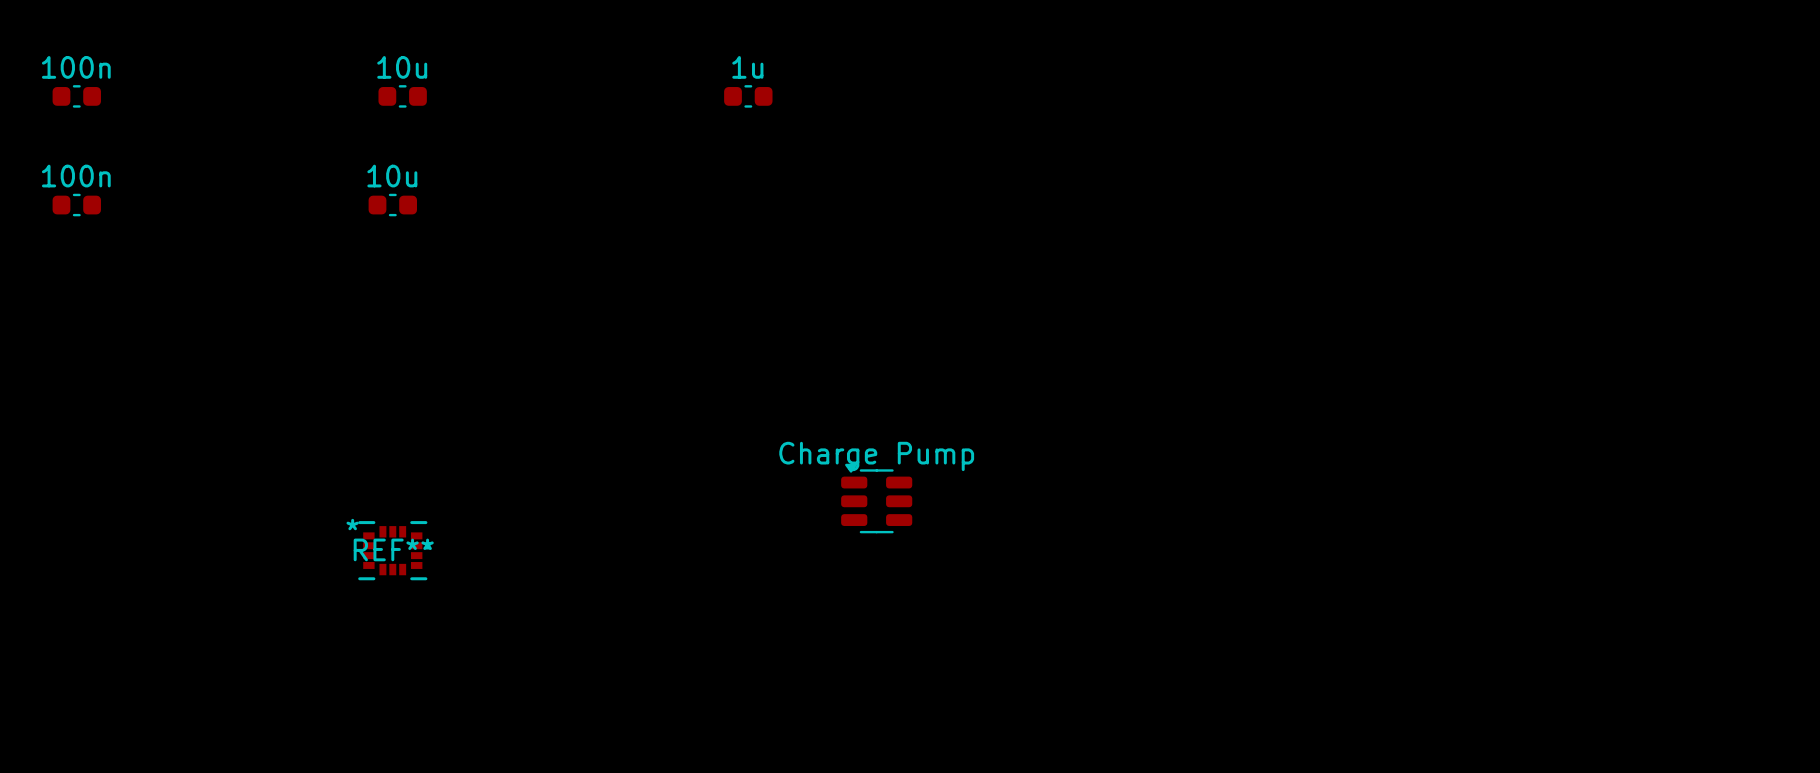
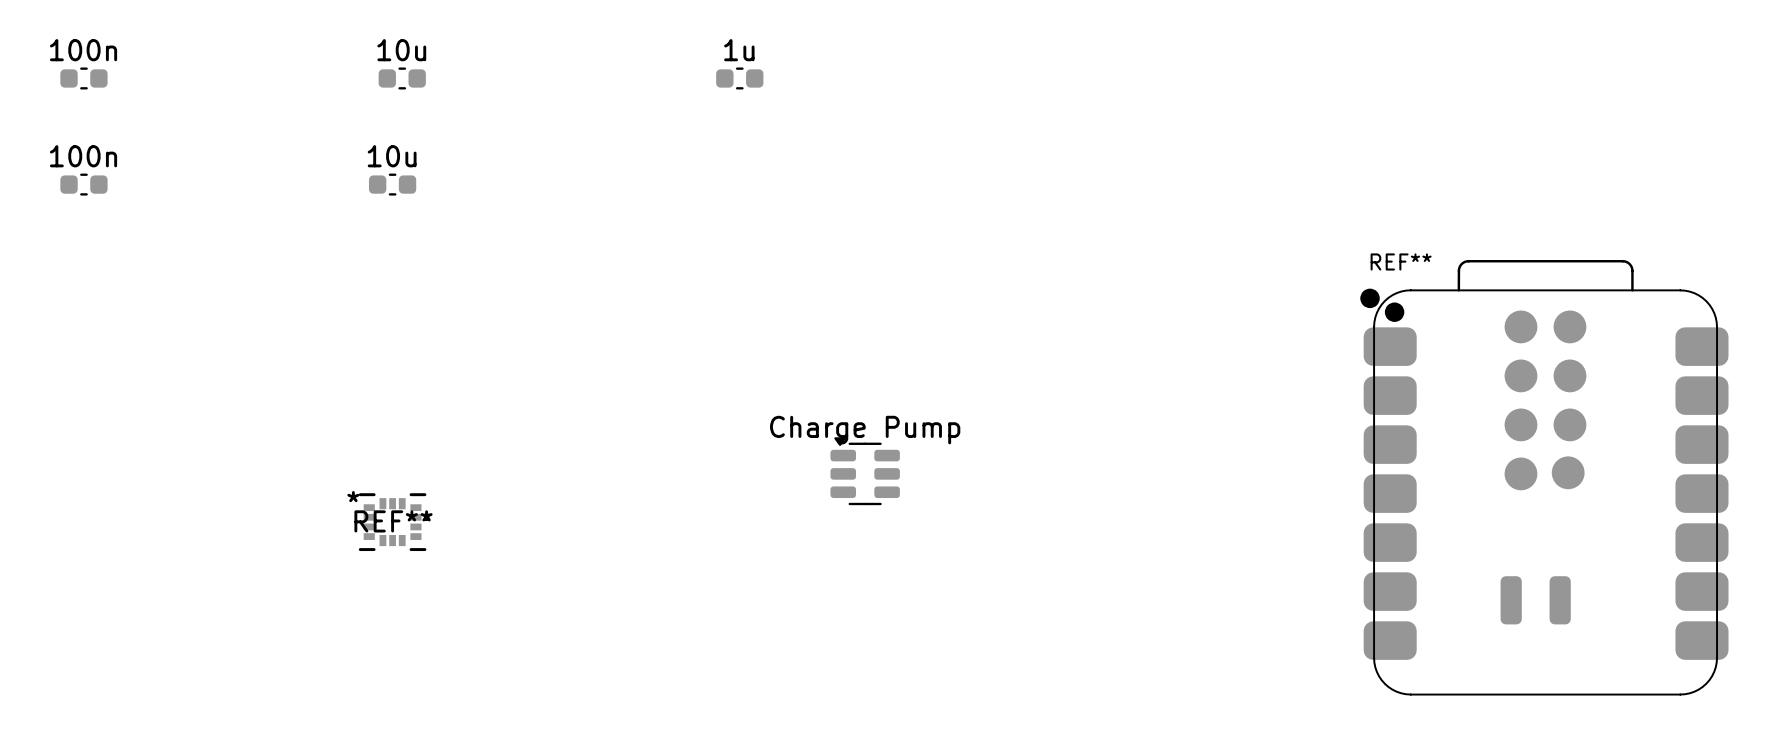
REF**: none -> (1544, 477)

